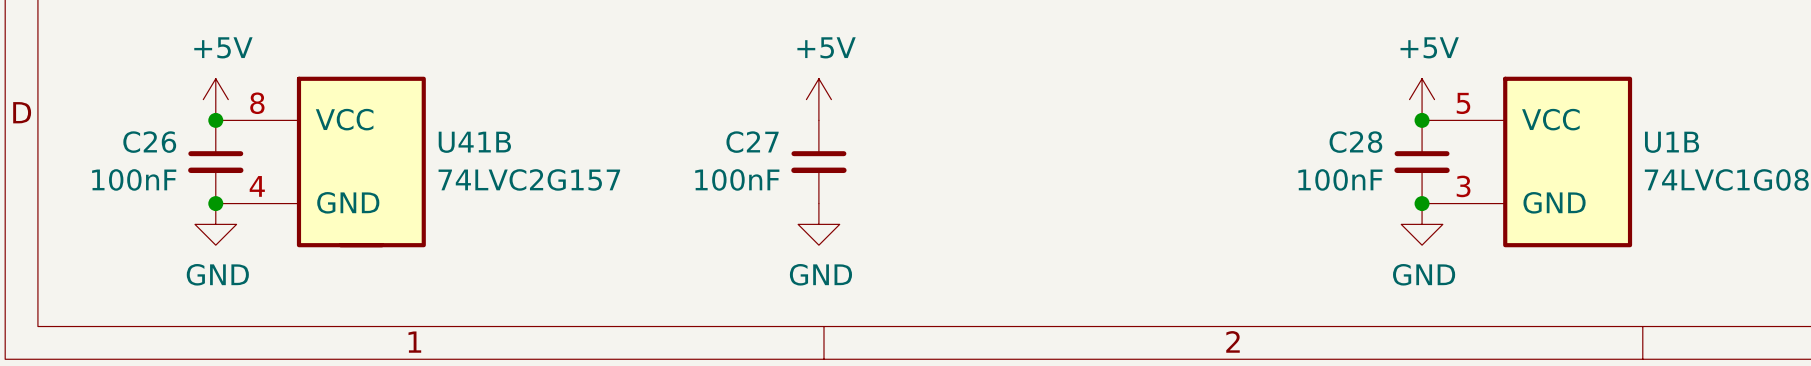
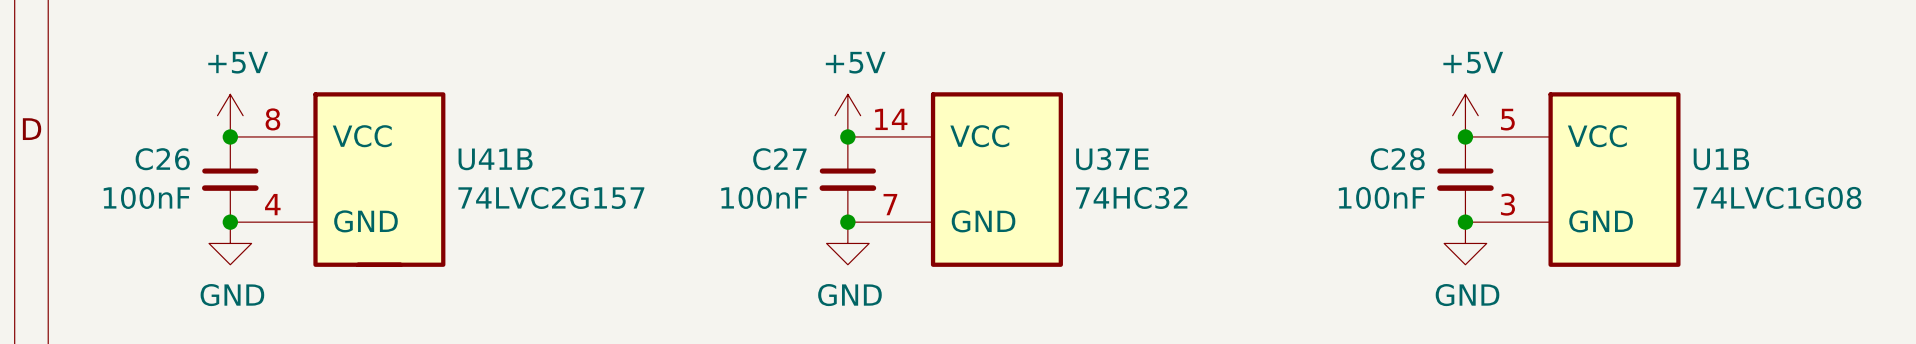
junction: none -> (847, 136)
U37E: none -> 74HC32 (955, 179)
junction: none -> (847, 222)

